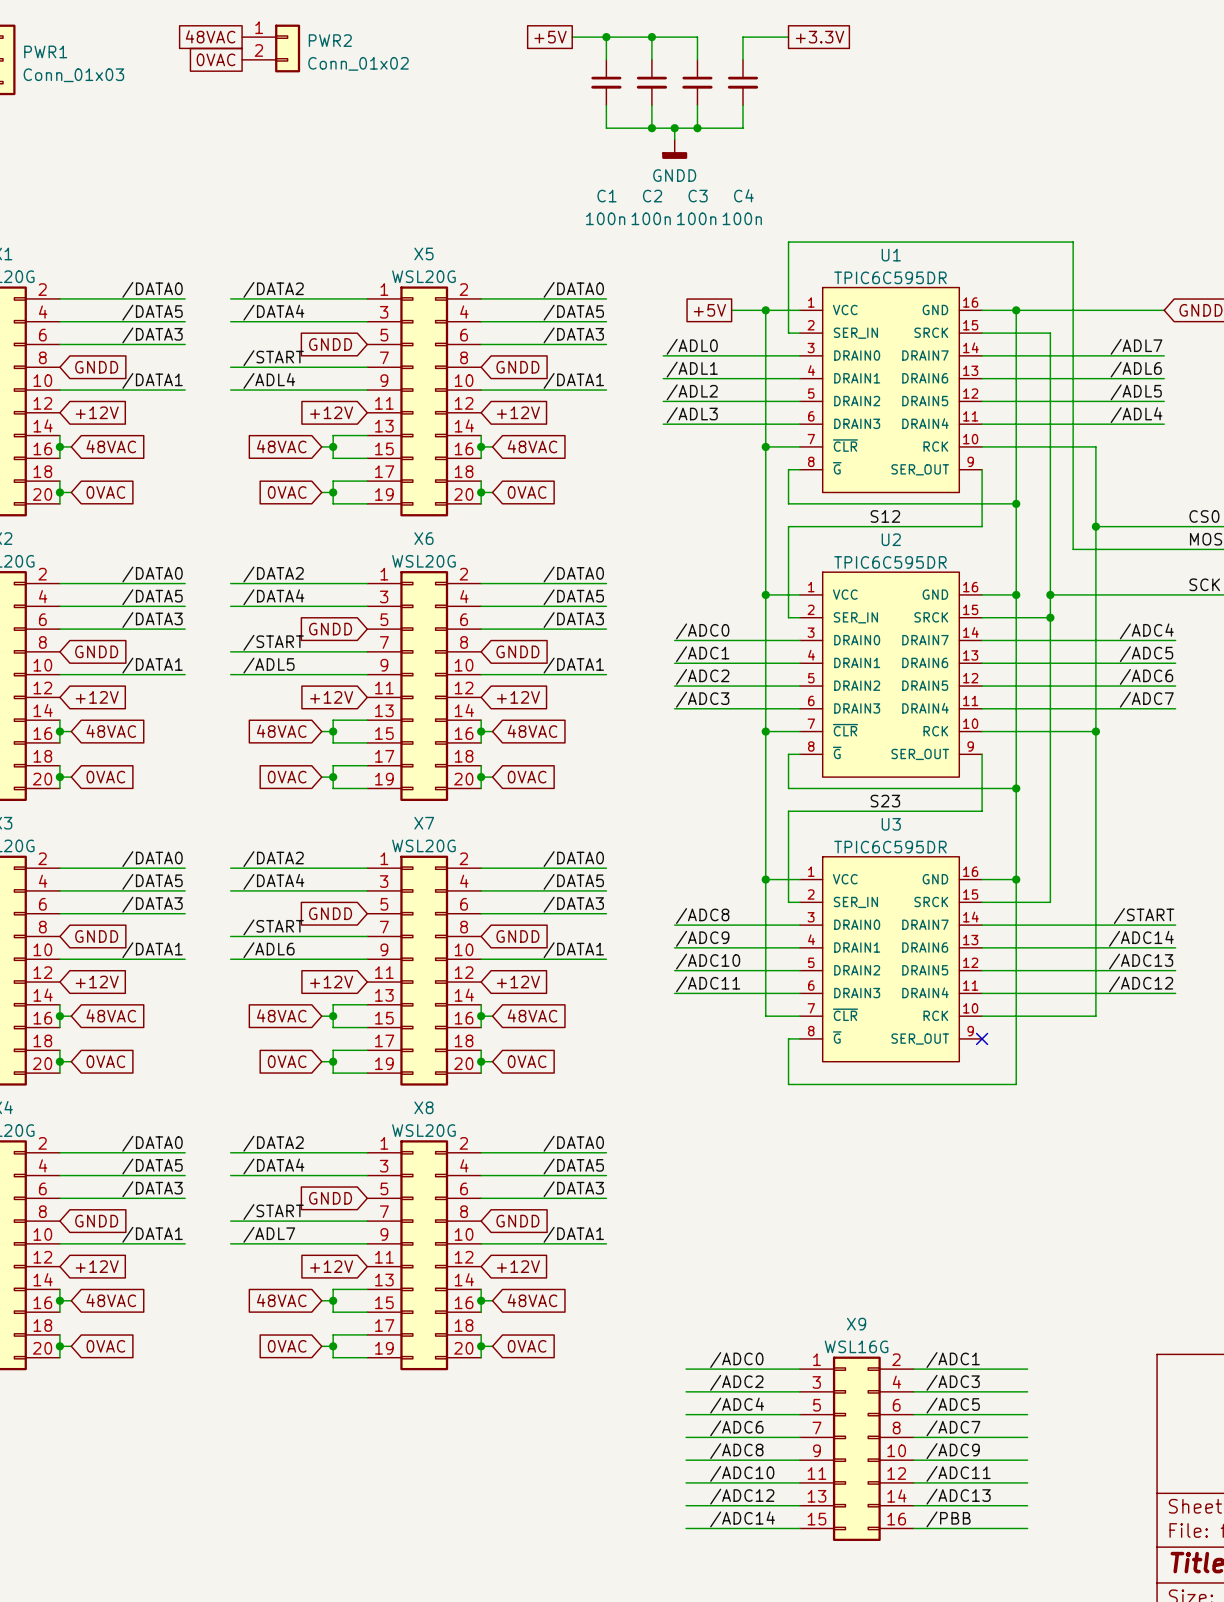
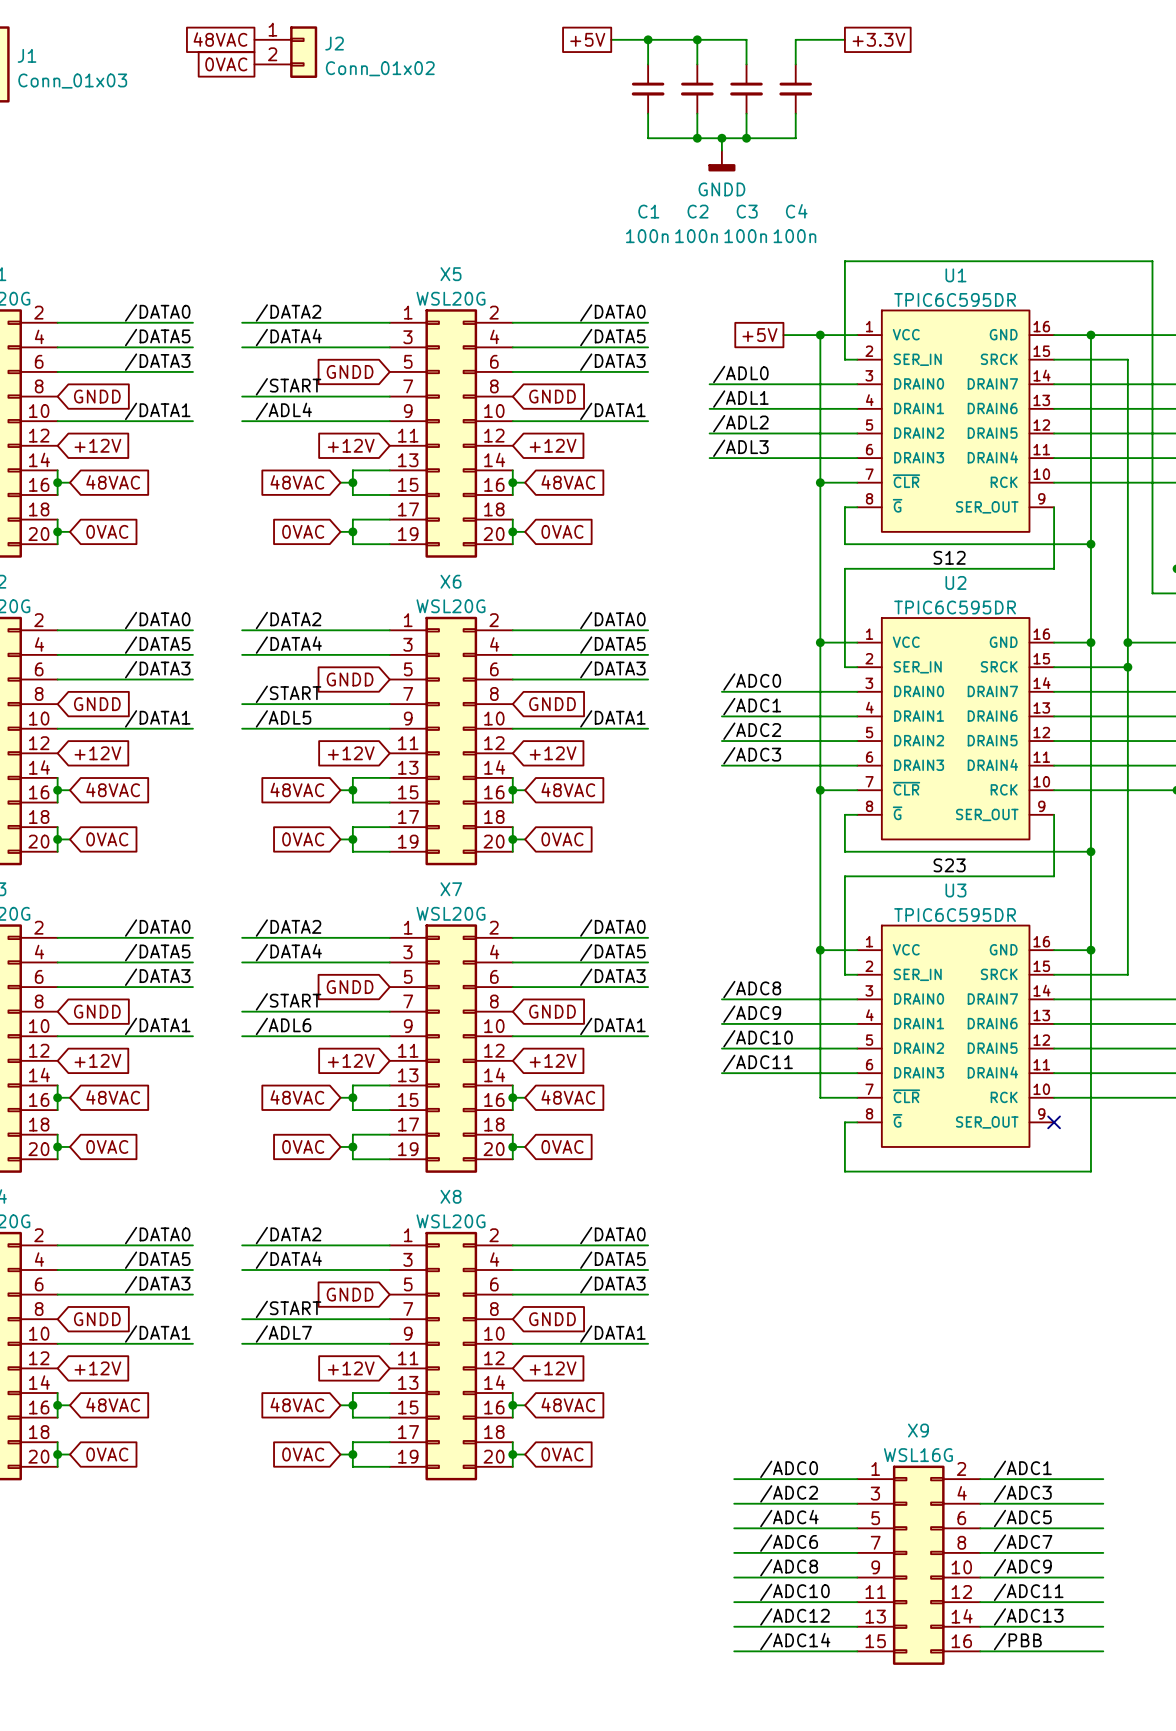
PWR2 name: PWR2 (330, 40) -> J2 (334, 43)
PWR1 name: PWR1 (45, 51) -> J1 (27, 55)

